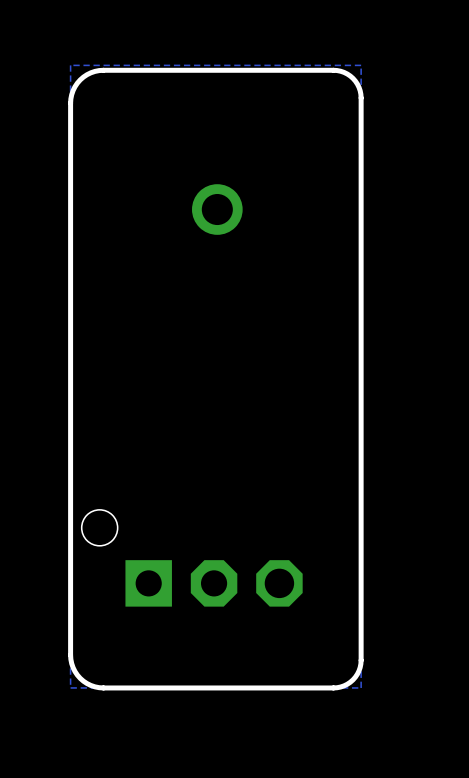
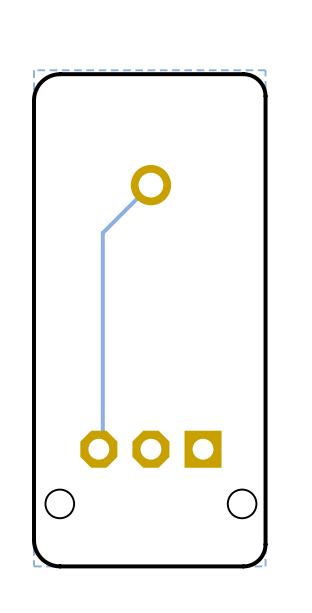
track: none -> (150, 185) (102, 233) (102, 447) (98, 449)
part footprint: [81, 509, 303, 607] -> [45, 430, 257, 519]

